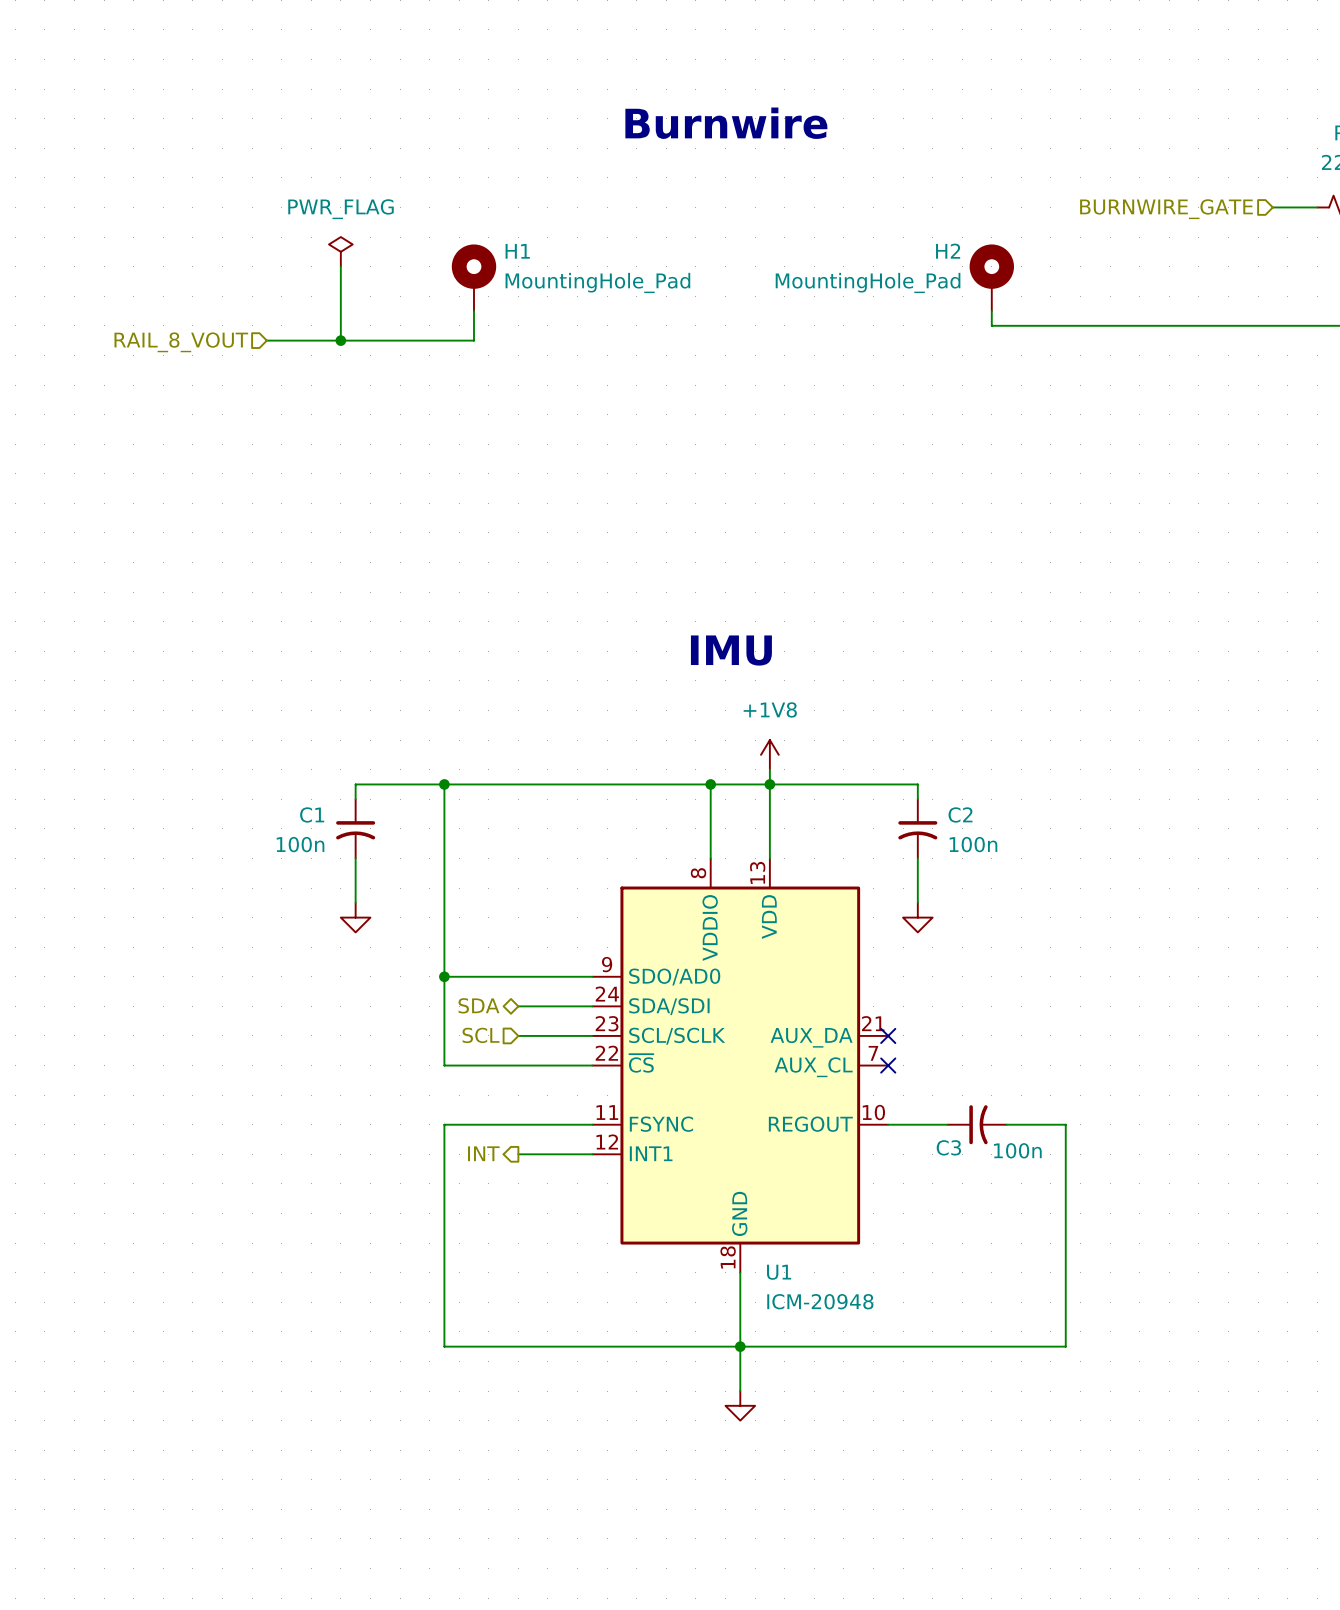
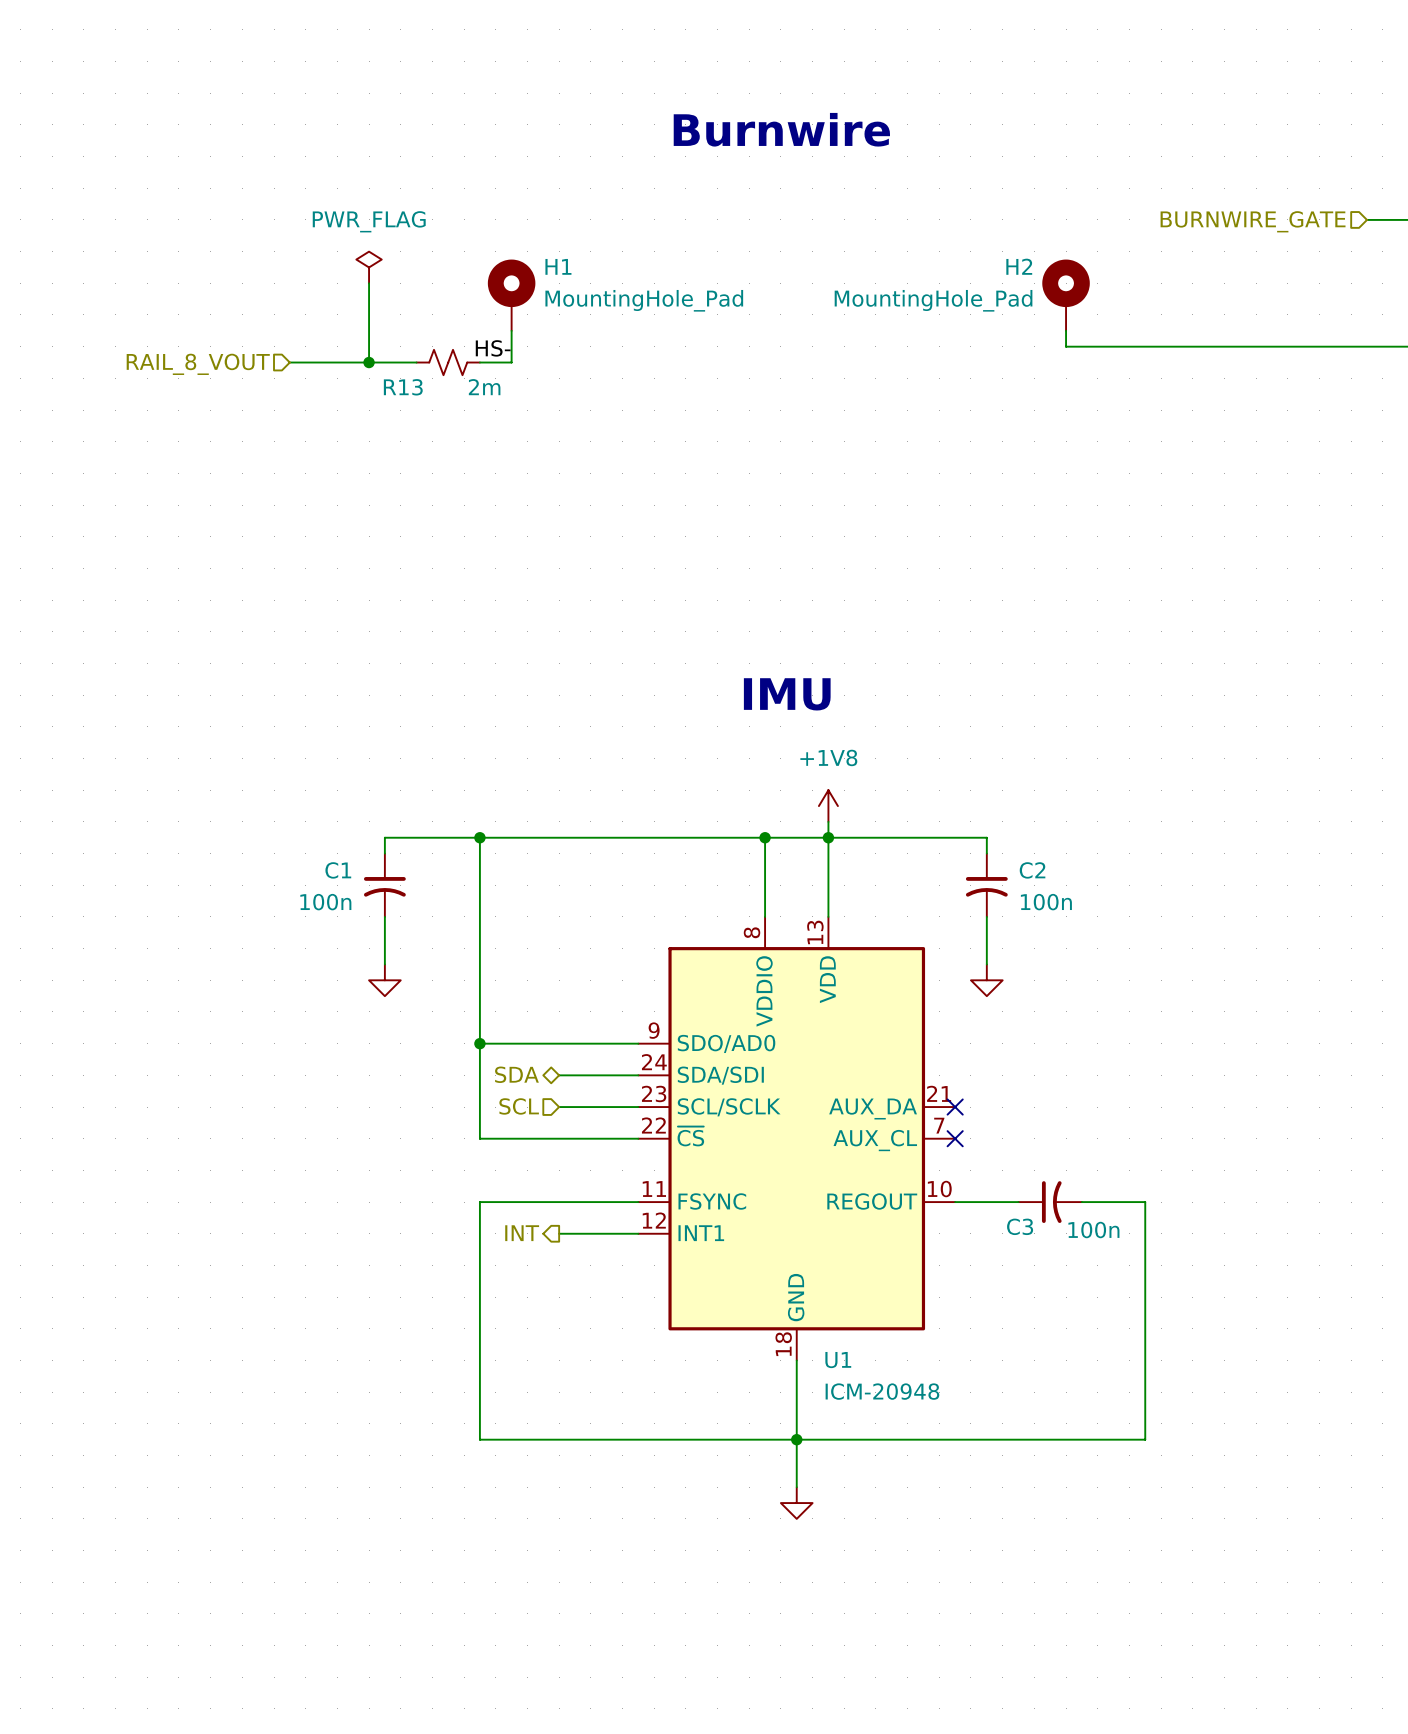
label: none -> HS- (493, 348)
R13: none -> 2m (448, 362)

